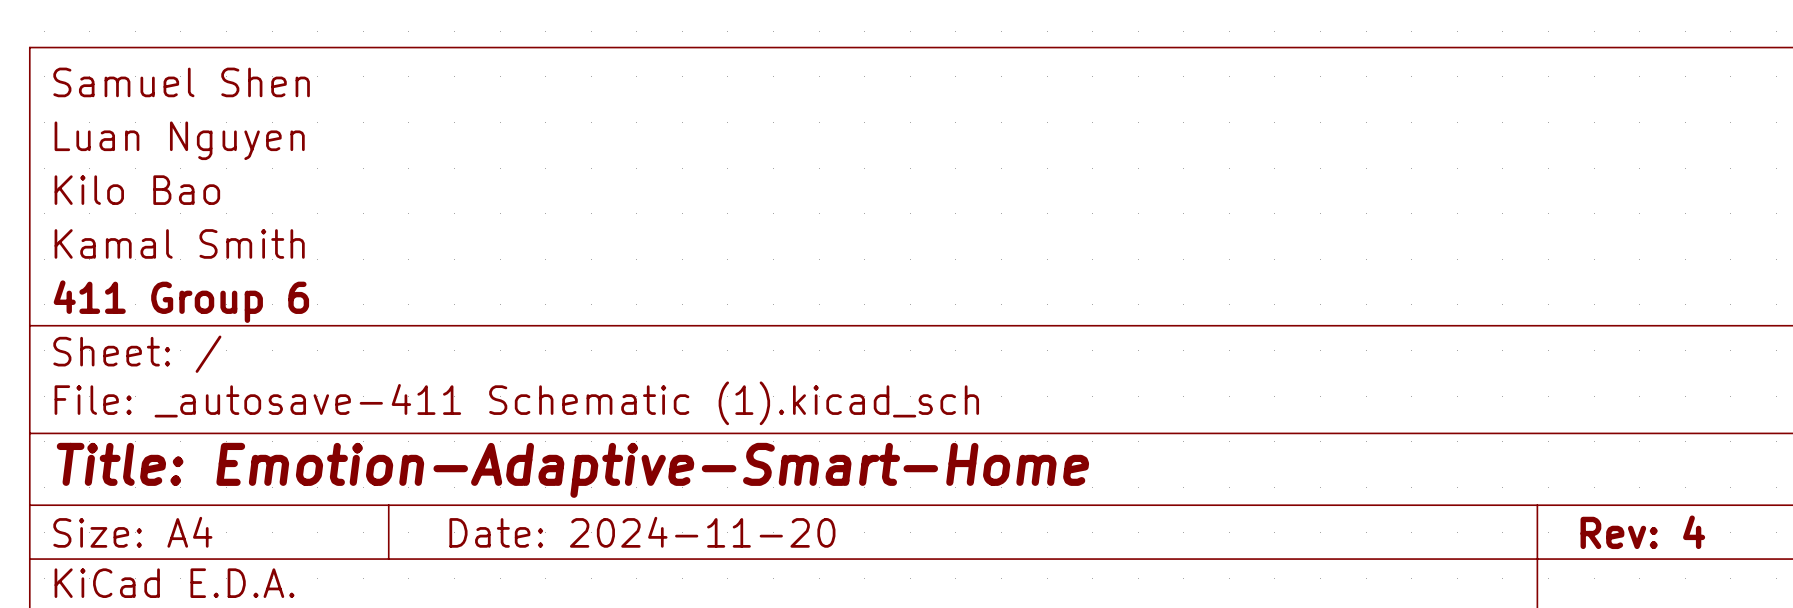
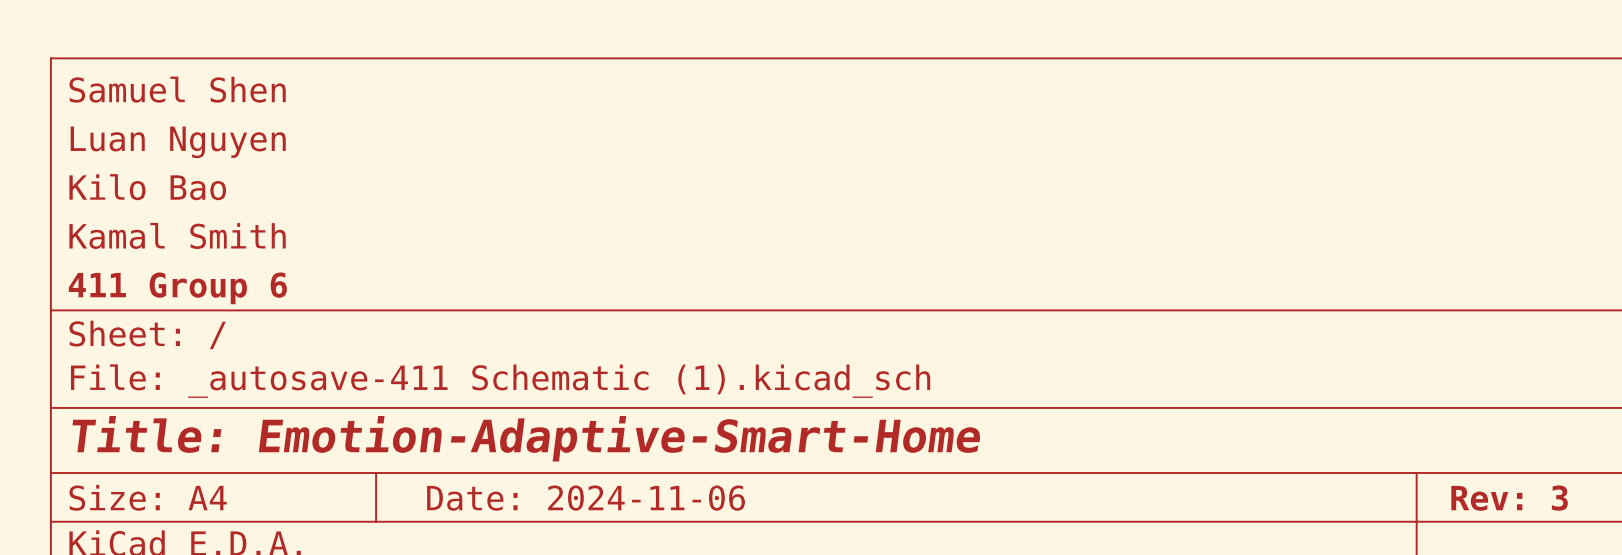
title block: Date: 2024-11-20 (642, 532) -> Date: 2024-11-06 (586, 498)
title block: Rev: 4 (1642, 532) -> Rev: 3 (1509, 498)

